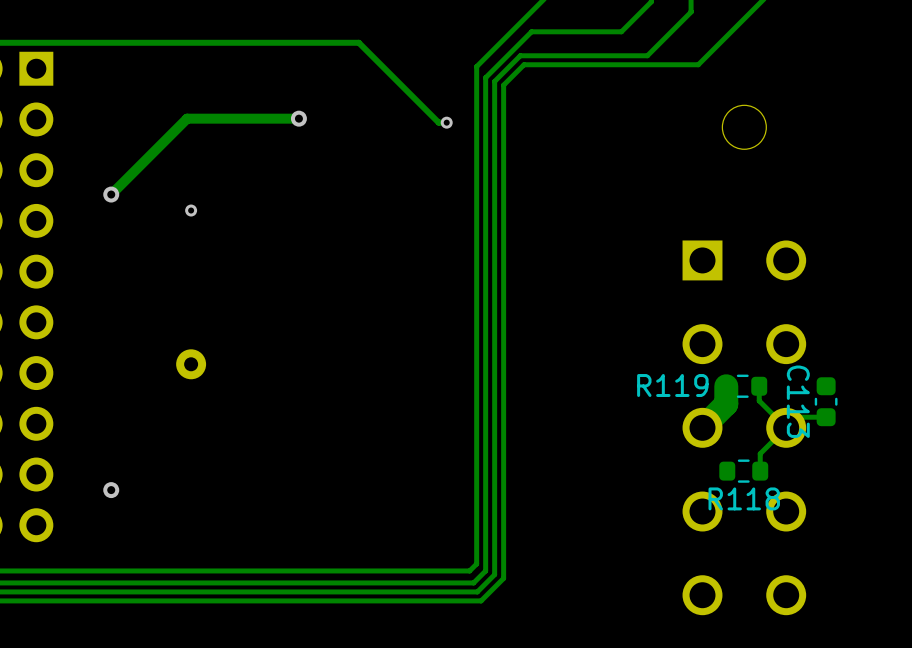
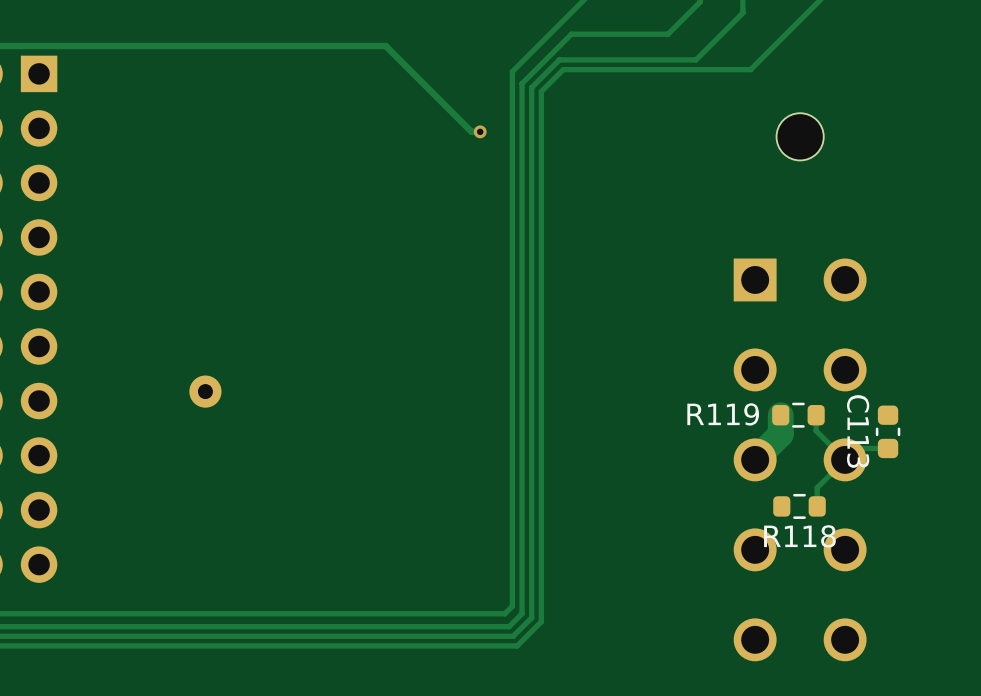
track: (298, 118) (187, 118) (111, 194) -> none
via: (298, 118) -> none
via: (111, 194) -> none
via: (191, 210) -> none
via: (111, 490) -> none

